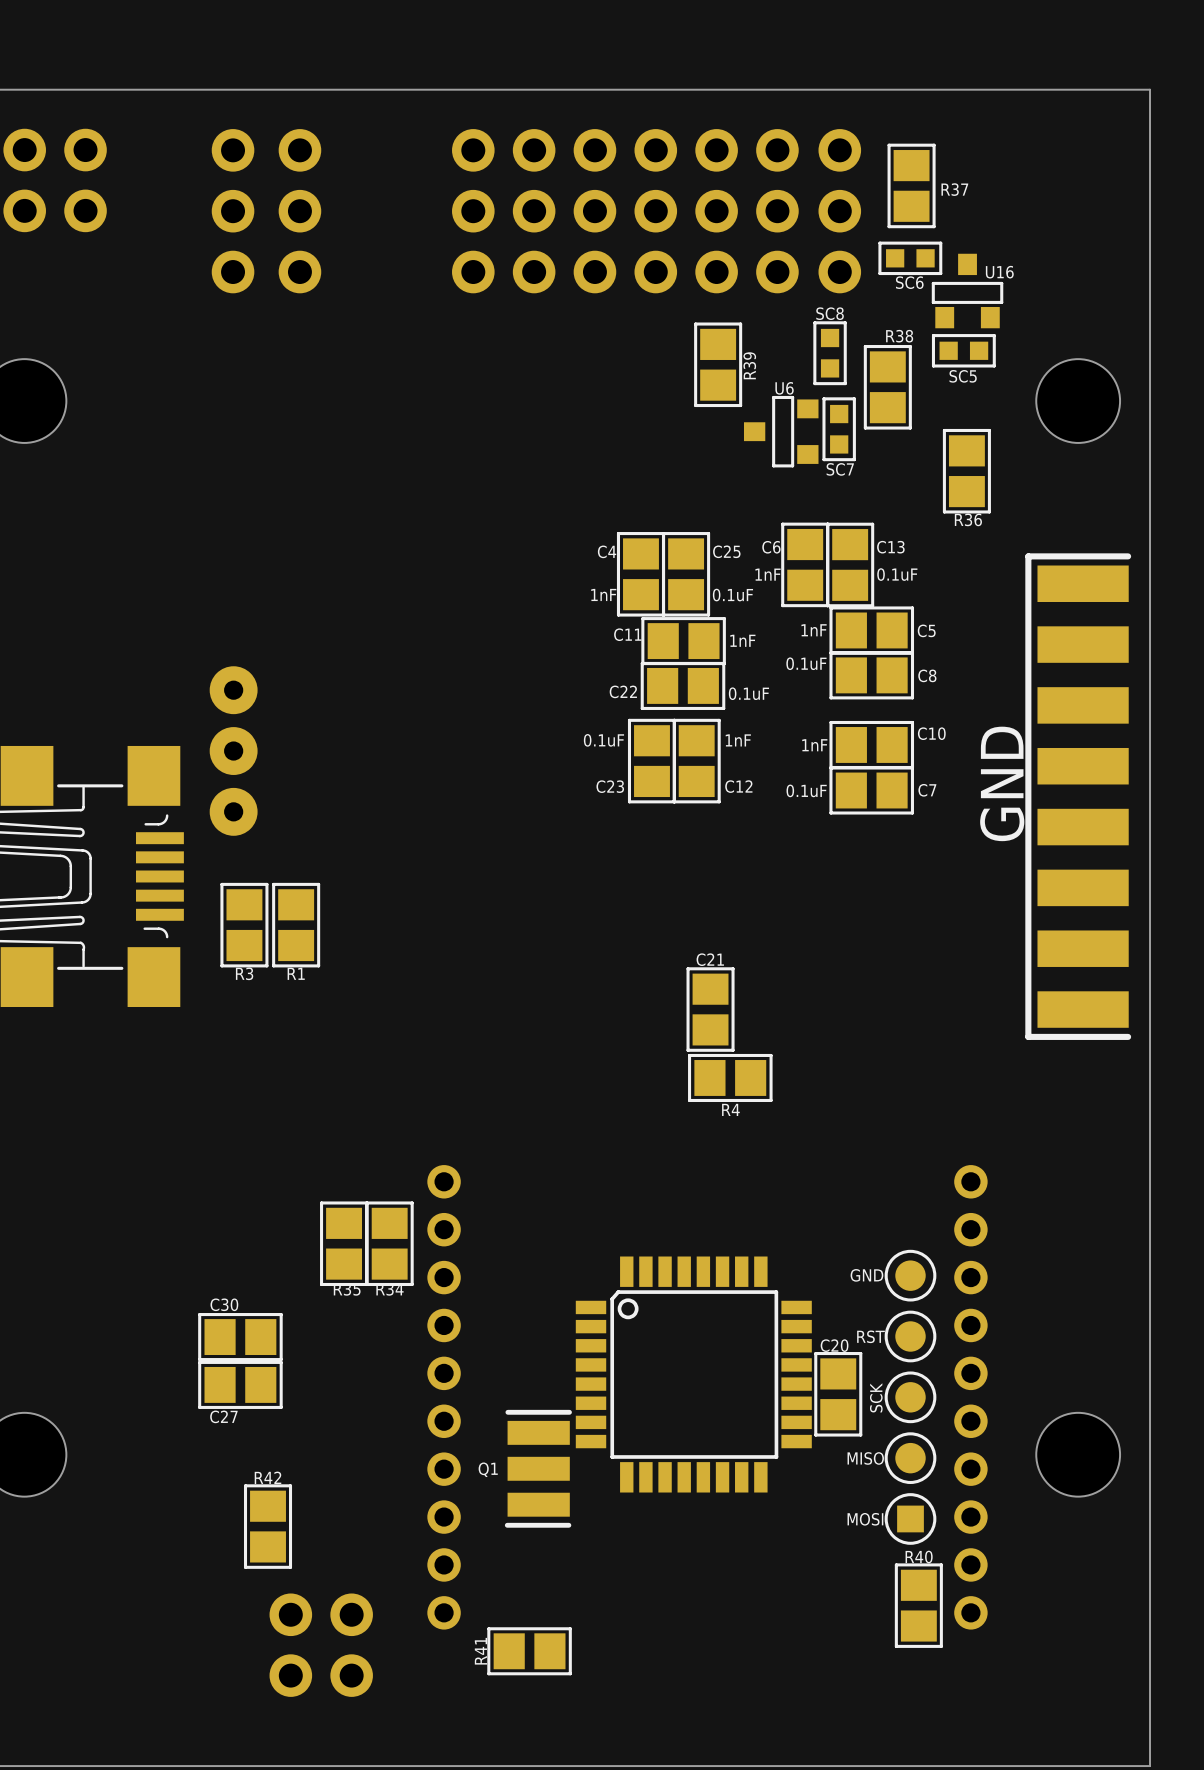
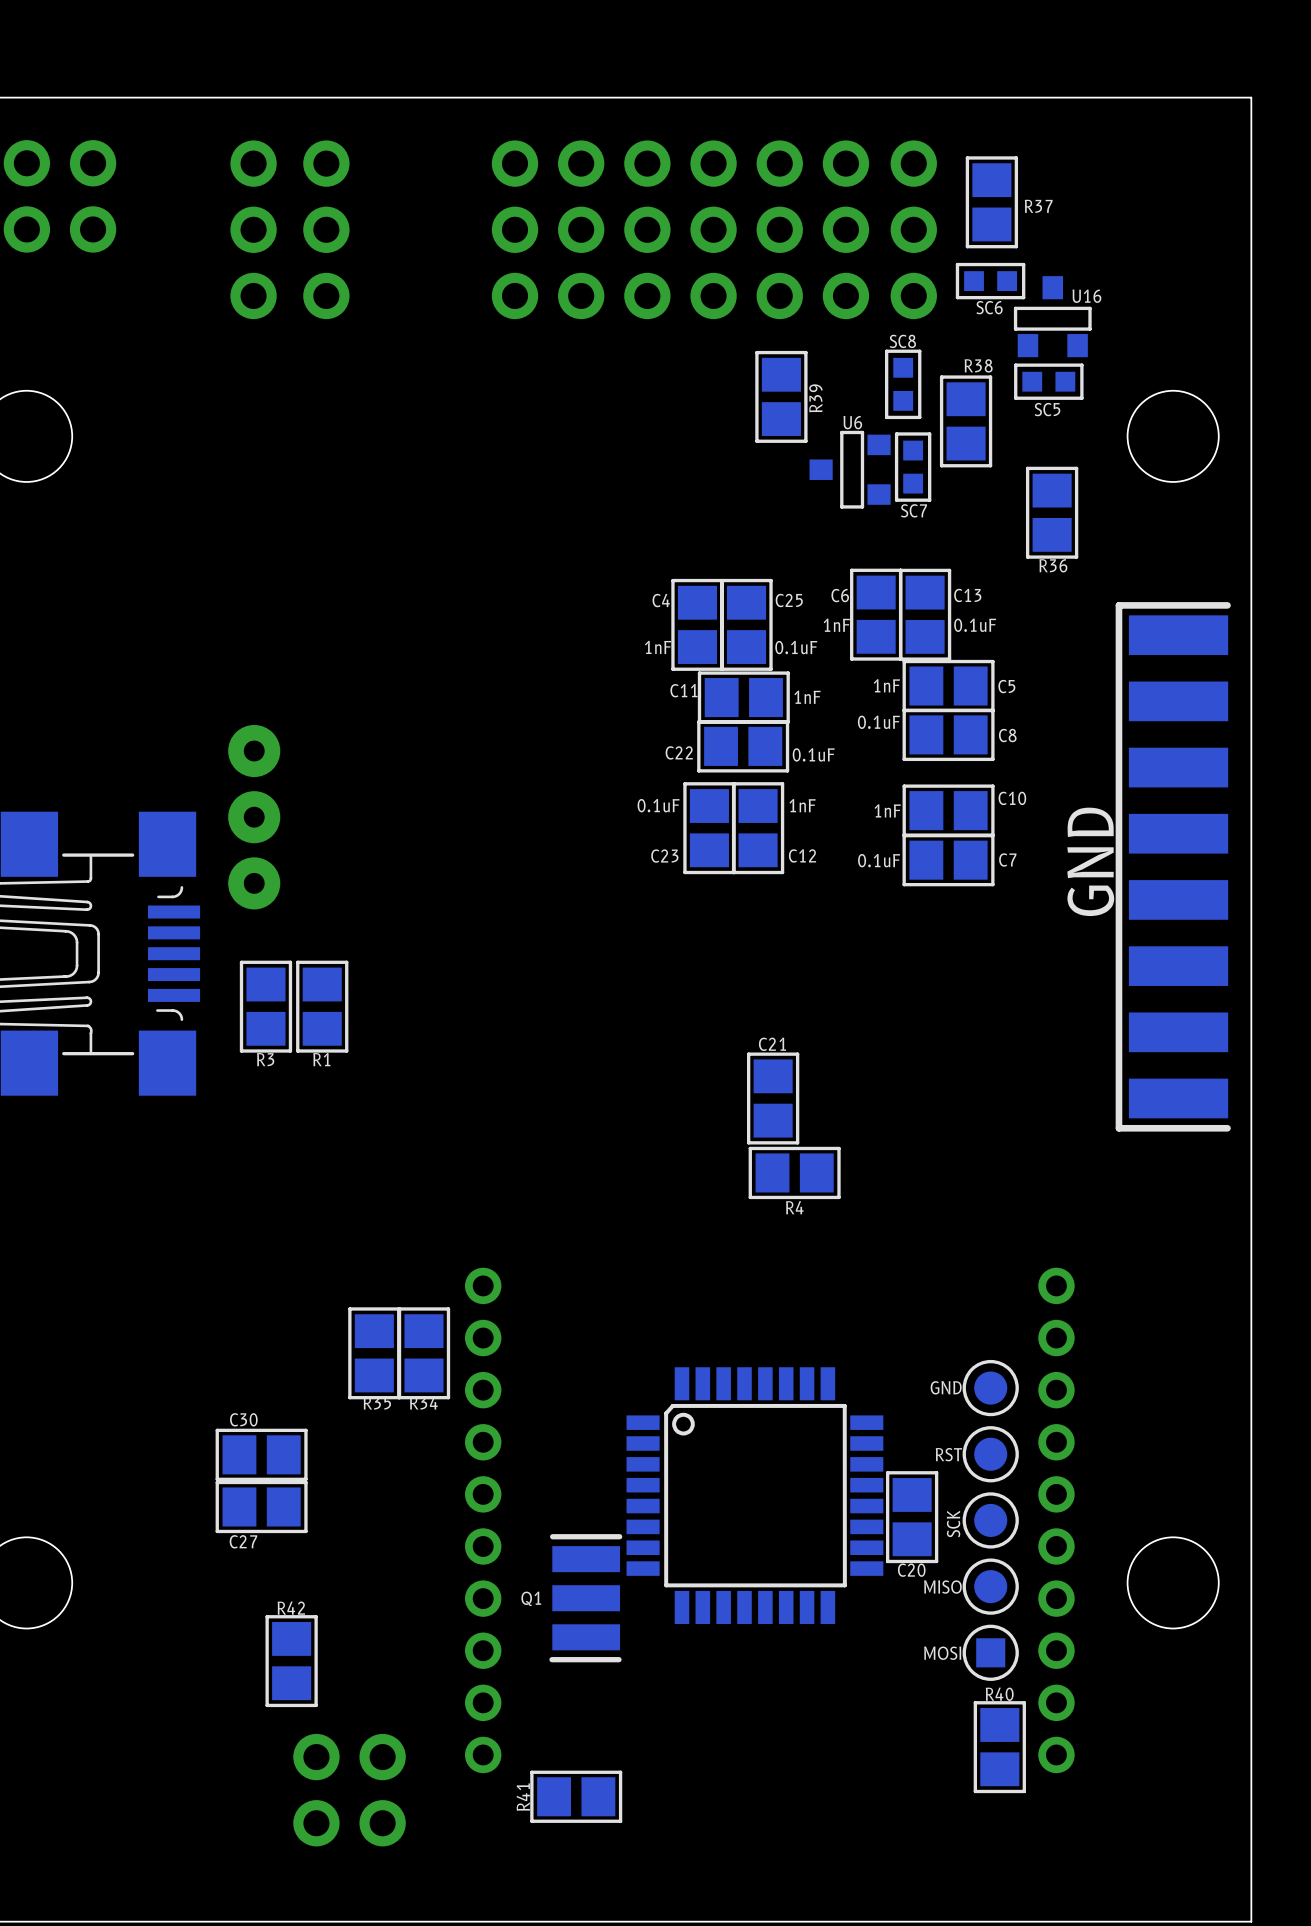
C20 name position: C20 (834, 1345) -> C20 (911, 1570)

